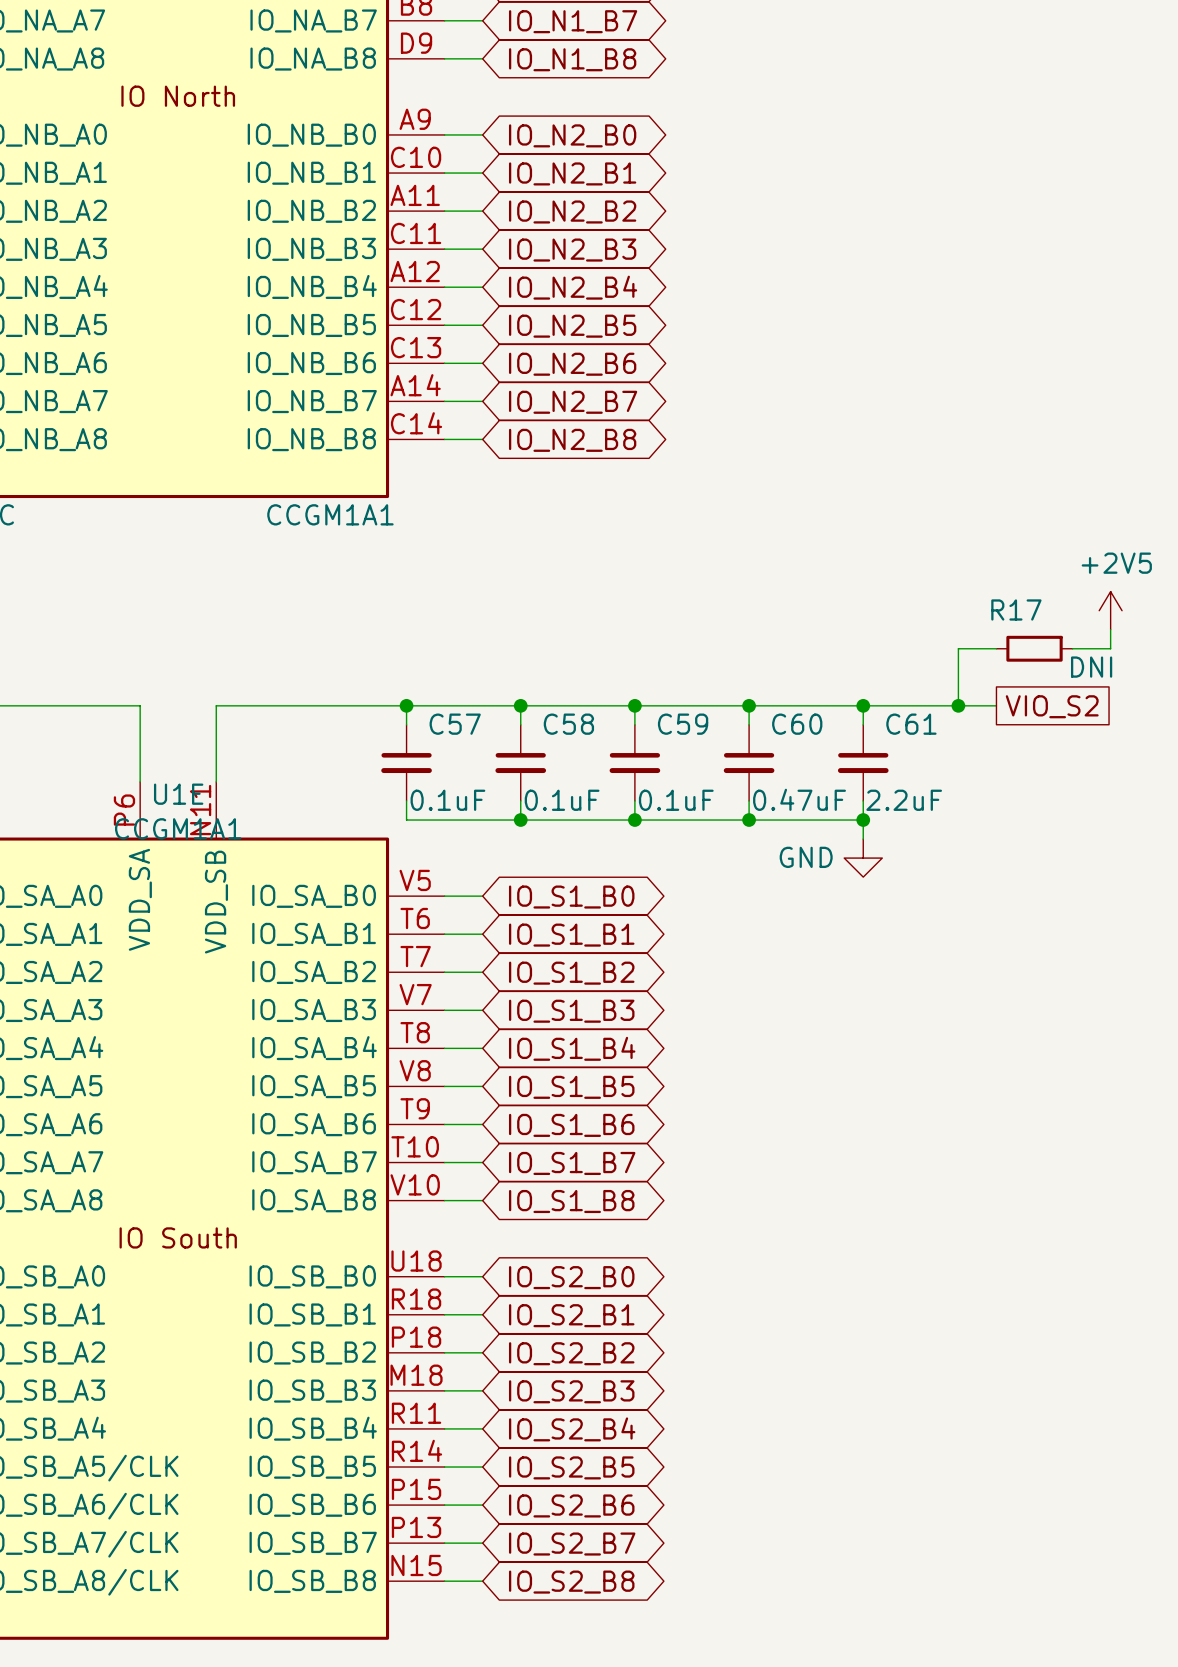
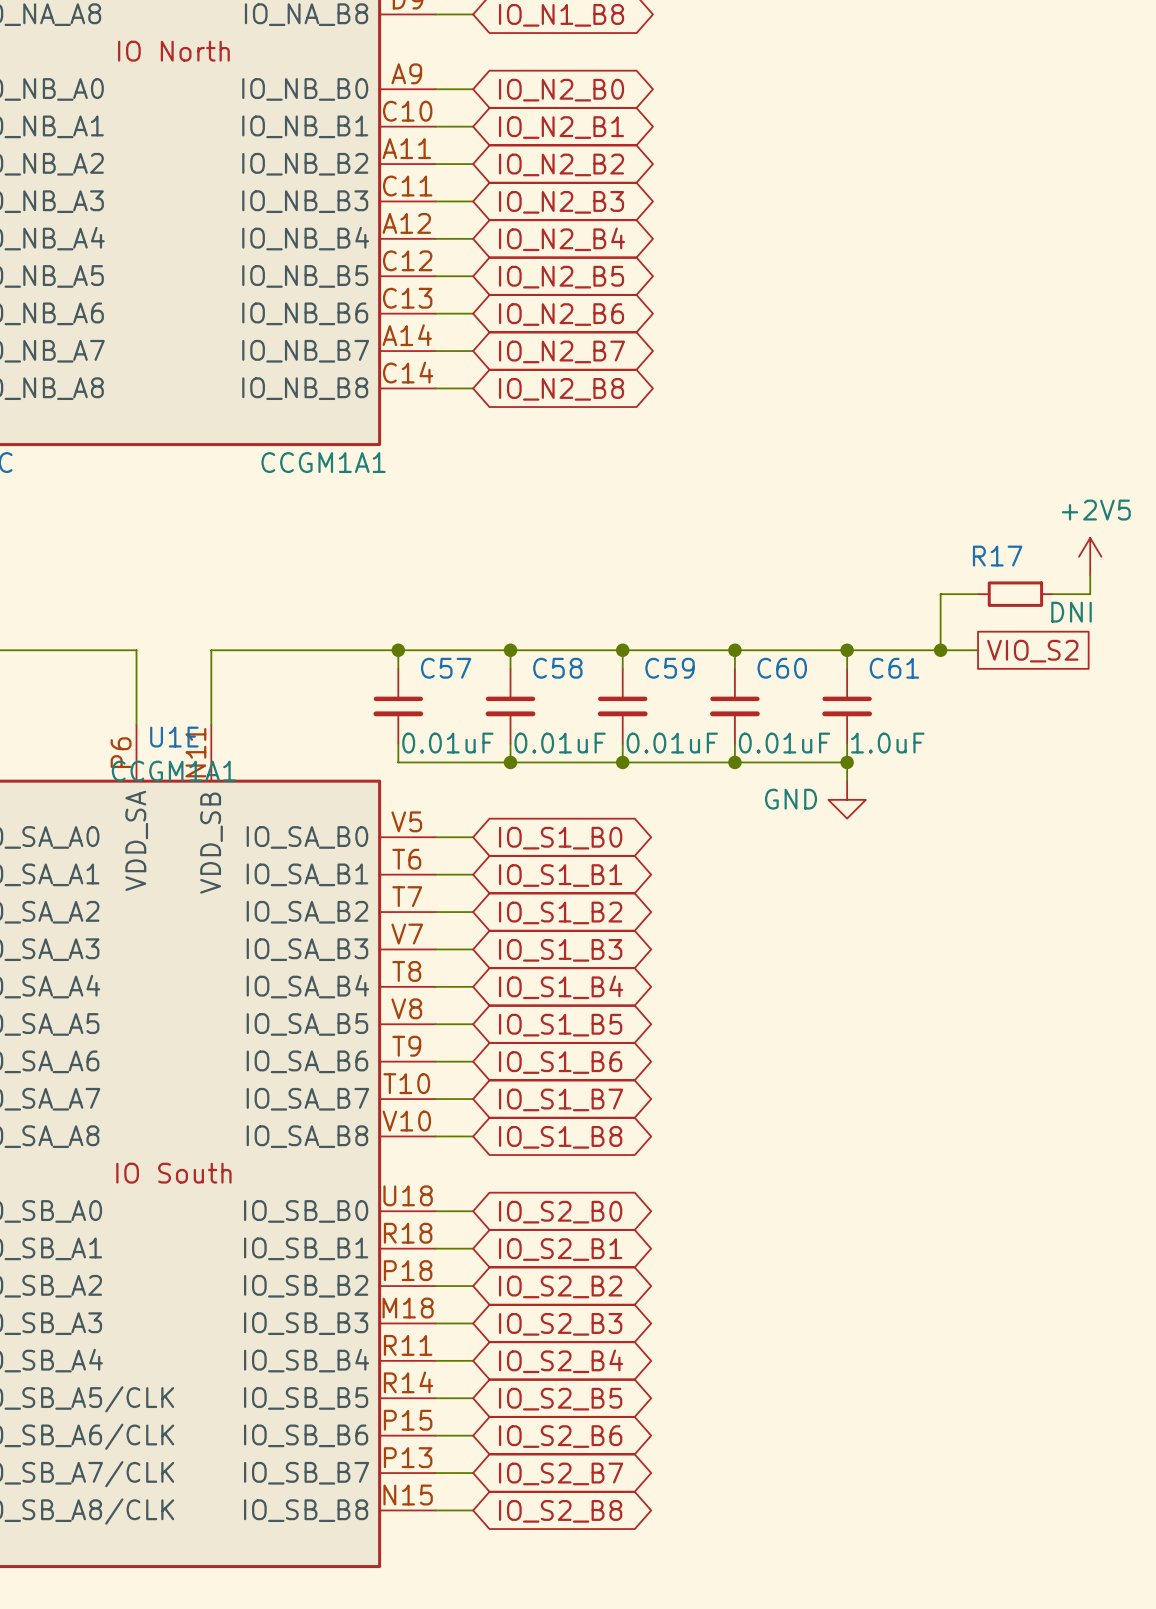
C60 value: 0.47uF (799, 799) -> 0.01uF (784, 743)
C57 value: 0.1uF (447, 800) -> 0.01uF (447, 743)
C58 value: 0.1uF (562, 800) -> 0.01uF (560, 743)
C59 value: 0.1uF (676, 800) -> 0.01uF (672, 743)
C61 value: 2.2uF (904, 800) -> 1.0uF (887, 743)

